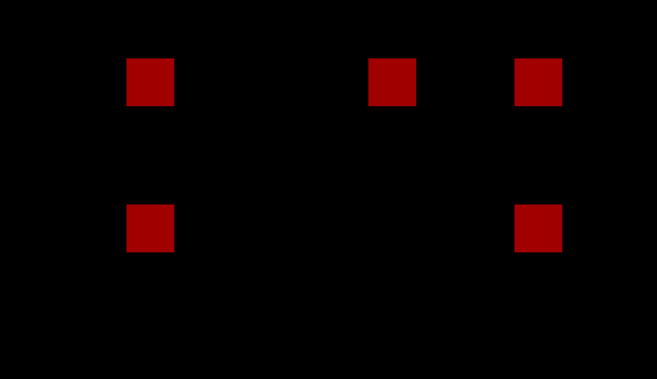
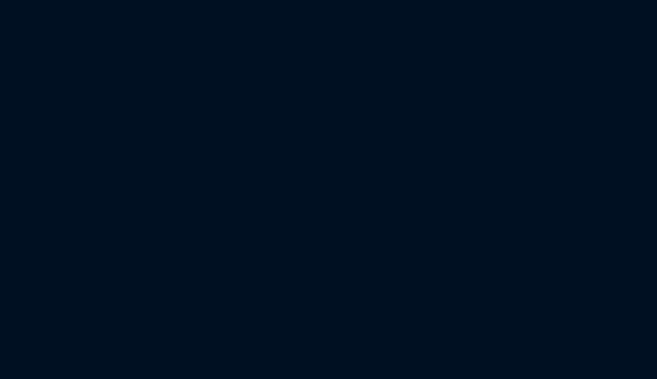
part: (150, 82) -> none
part: (392, 82) -> none
part: (538, 82) -> none
part: (150, 228) -> none
part: (538, 228) -> none

